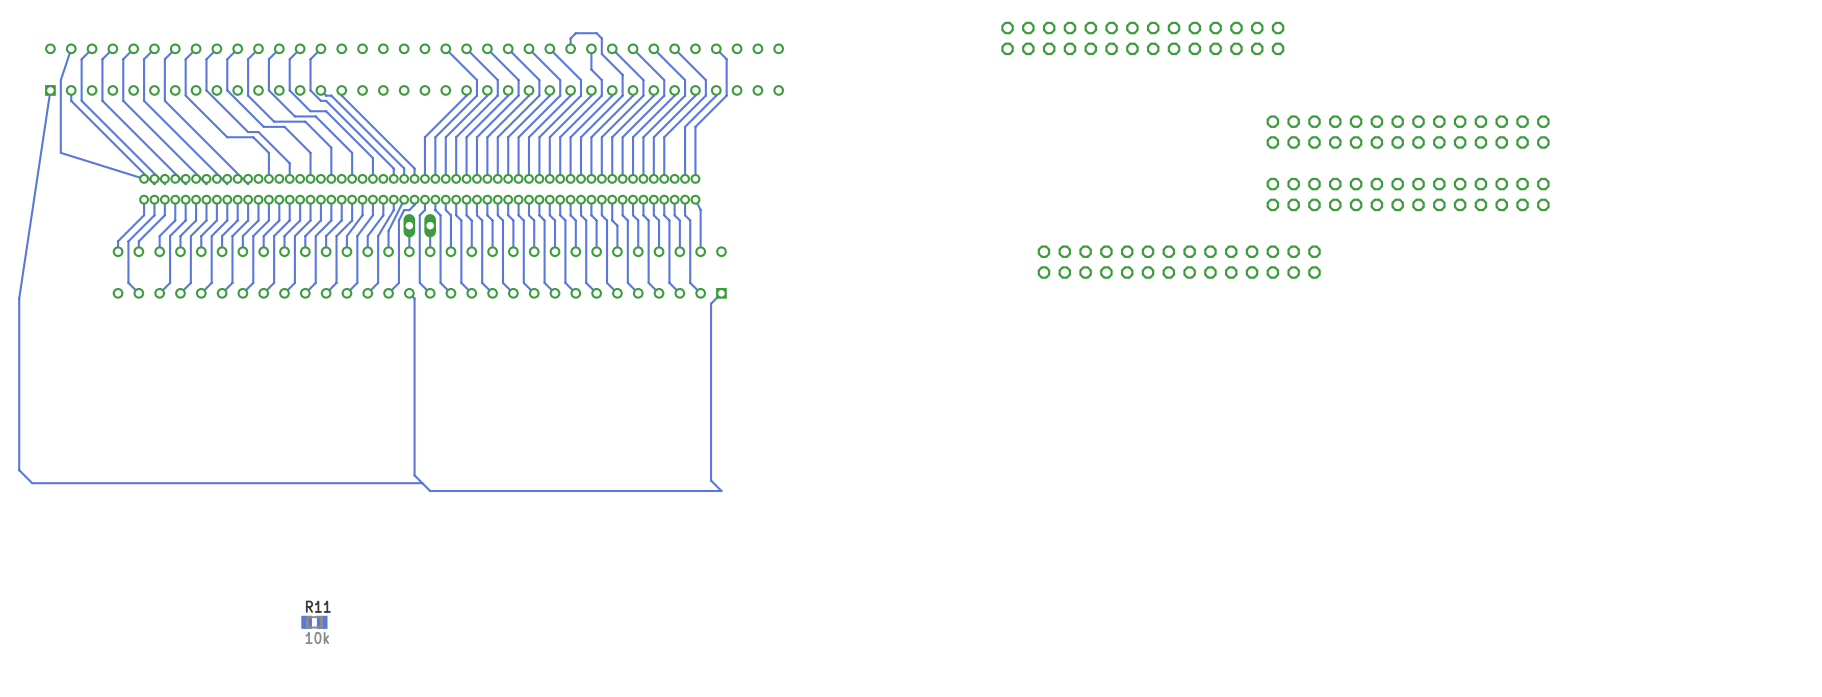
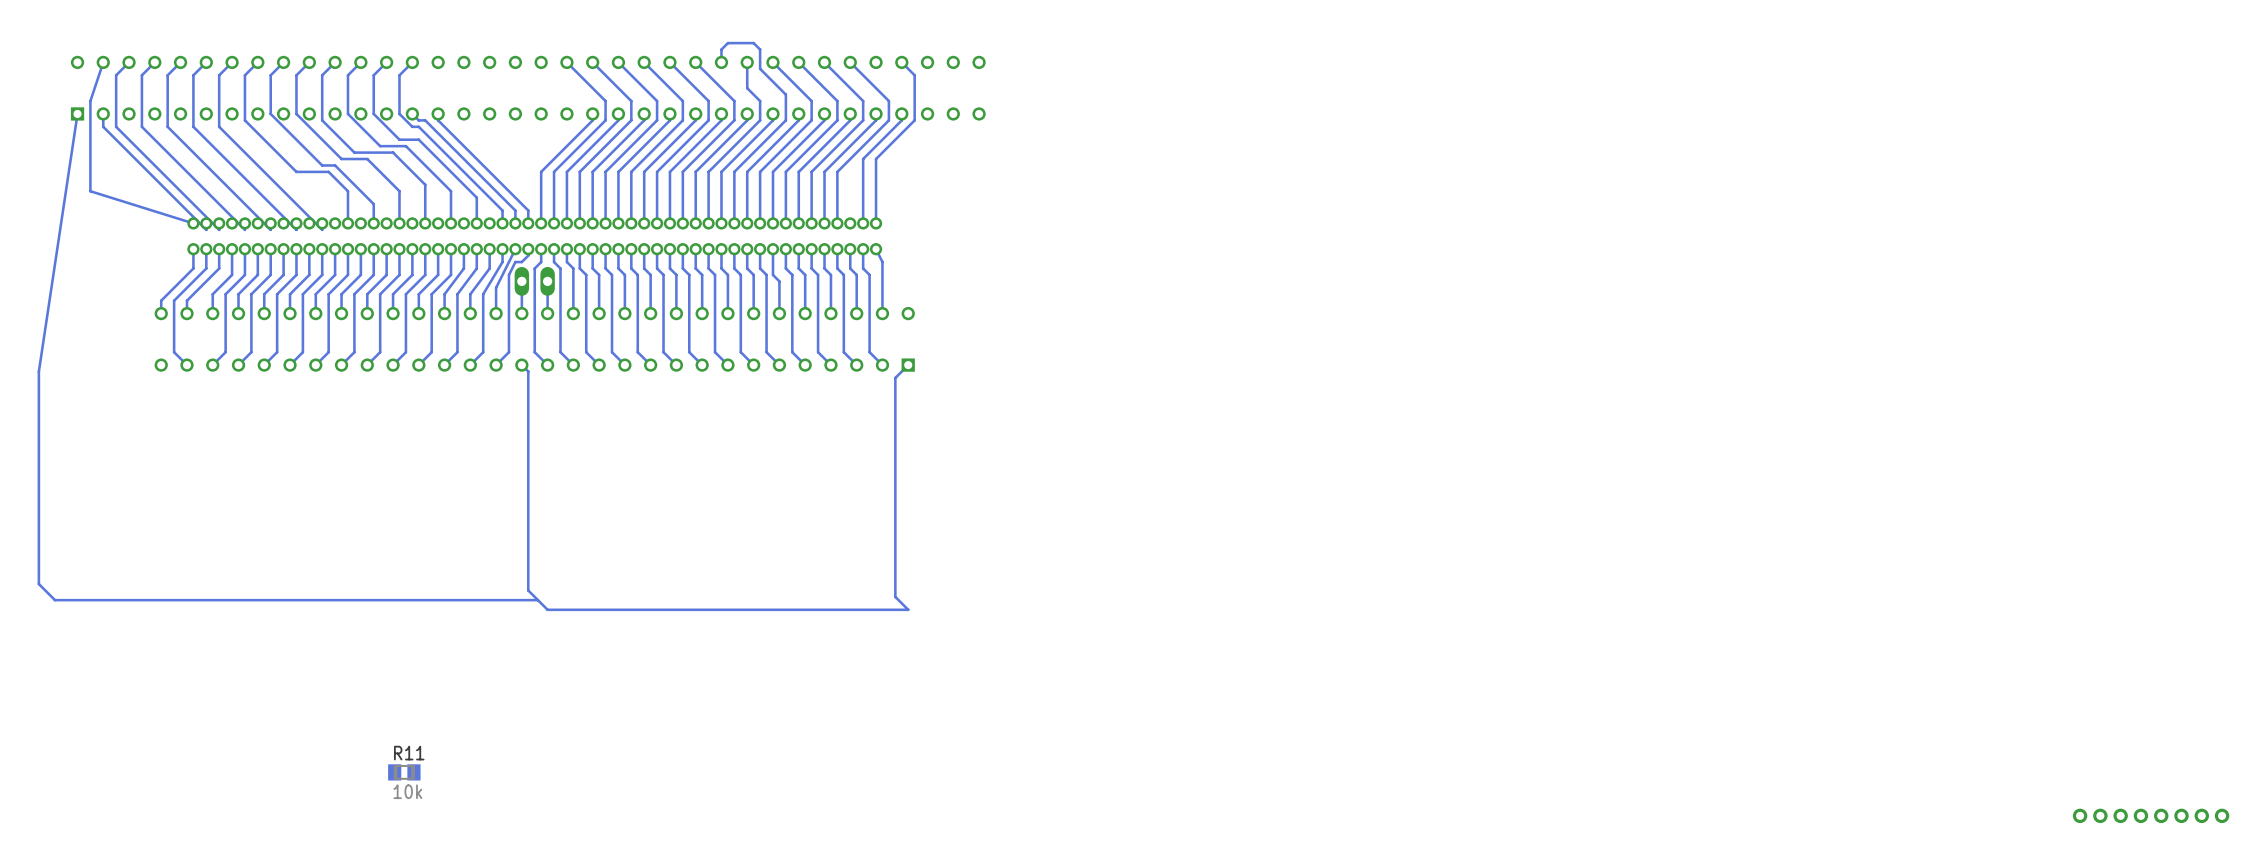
part: (1142, 38) -> none
part: (1408, 132) -> none
part: (1408, 194) -> none
part: (1179, 262) -> none
part: none -> (2151, 815)

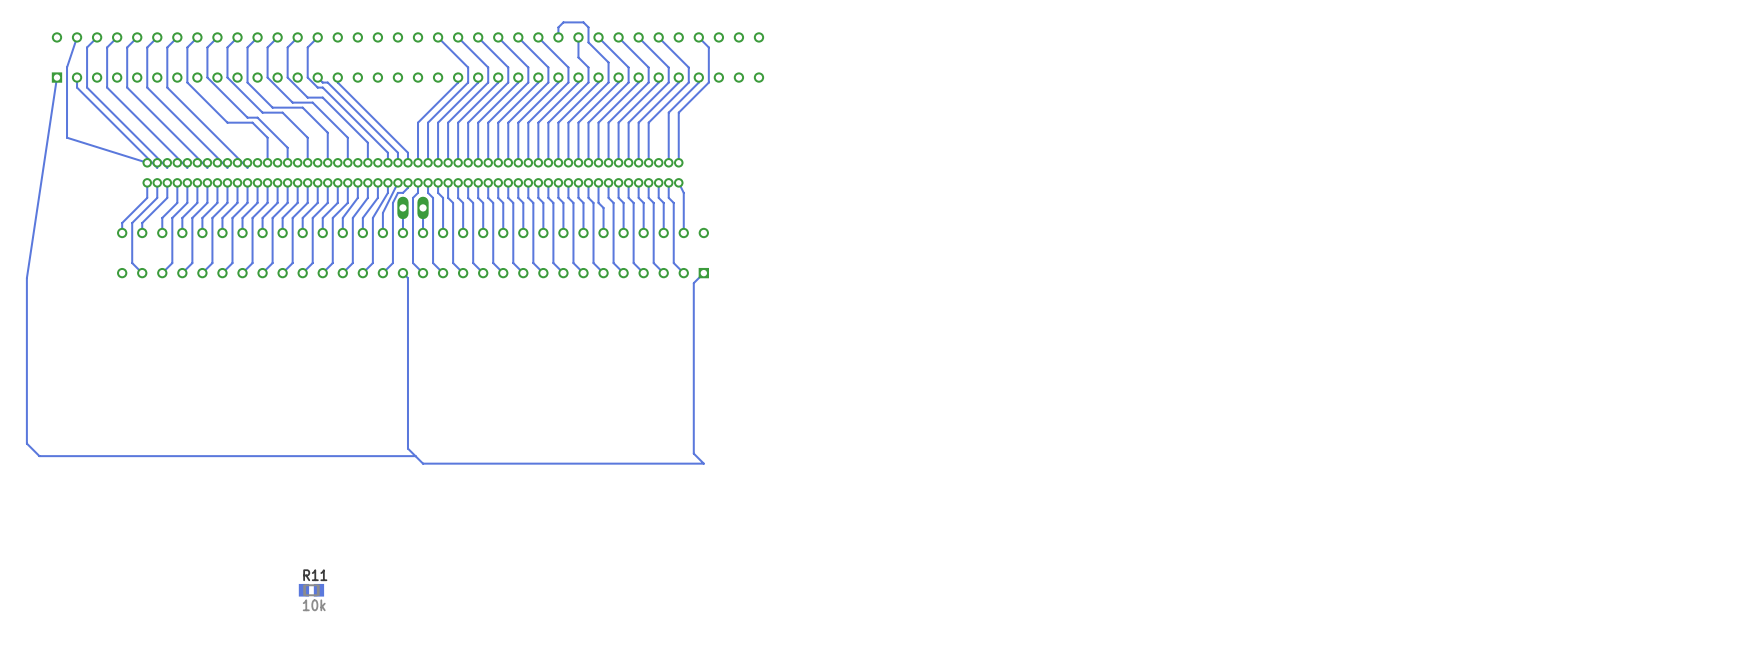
part: (2151, 815) -> none

